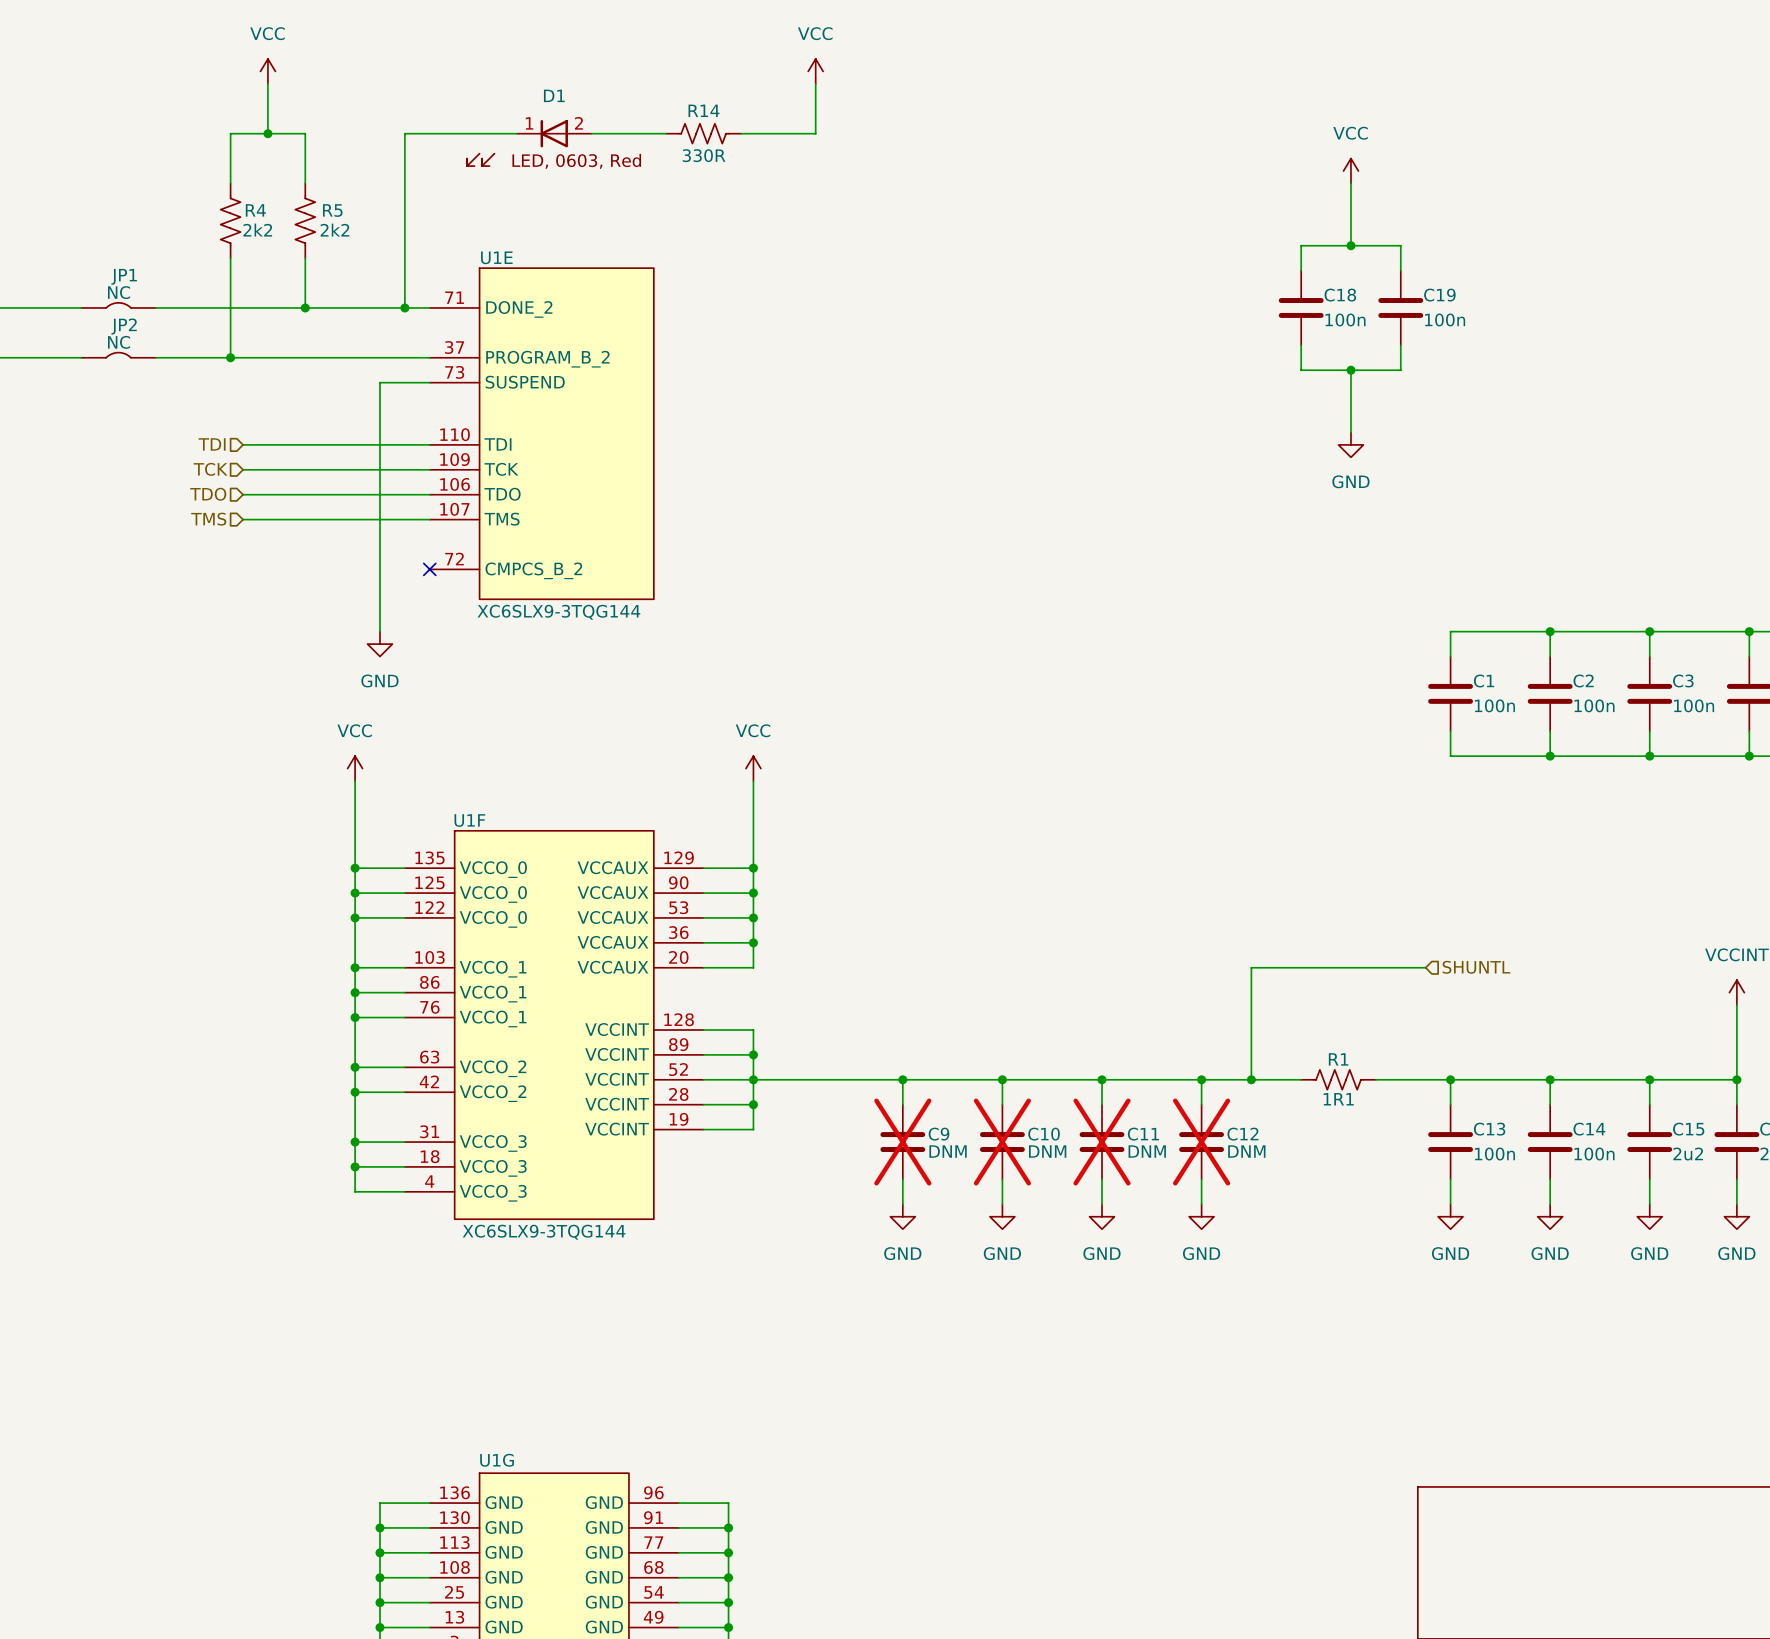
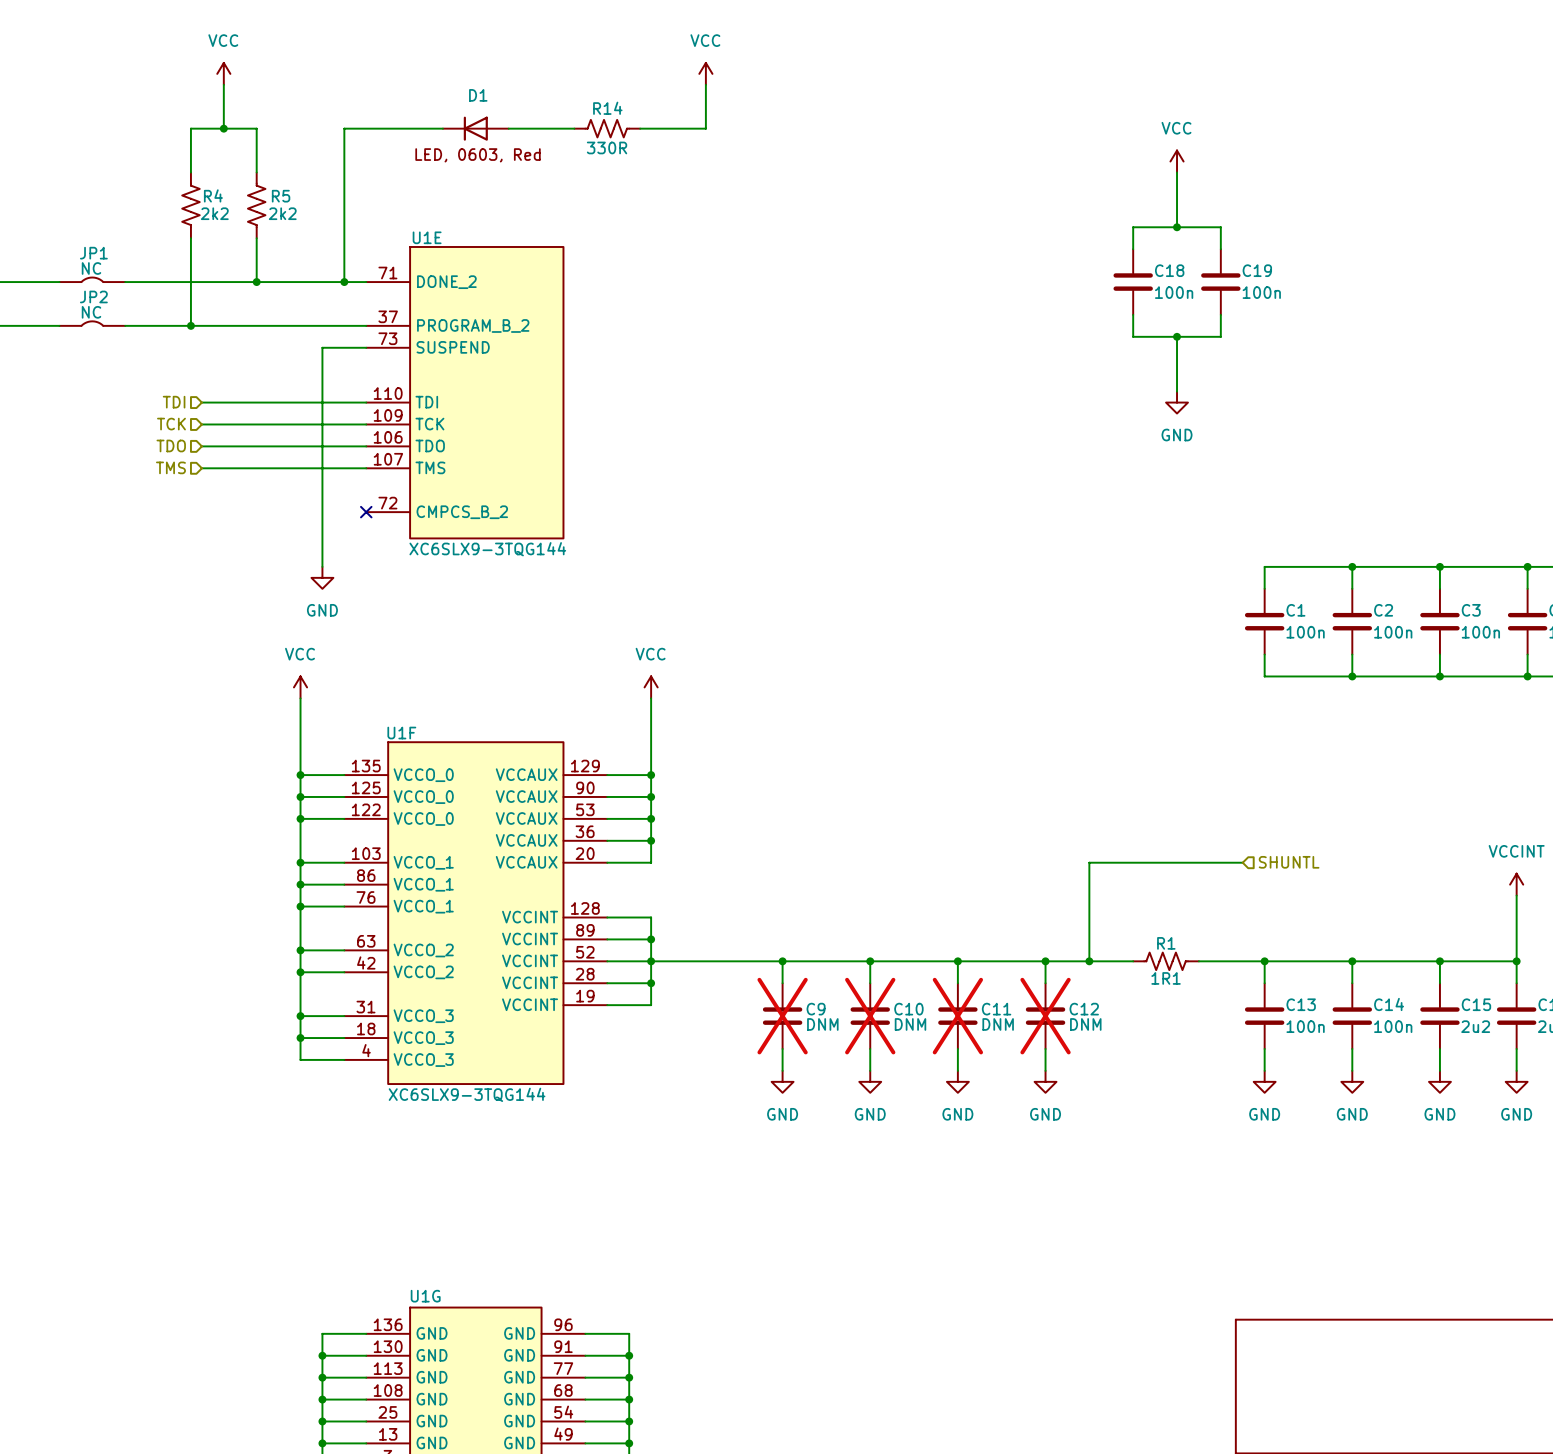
D1 symbol: [467, 120, 592, 167] -> [418, 116, 509, 149]

